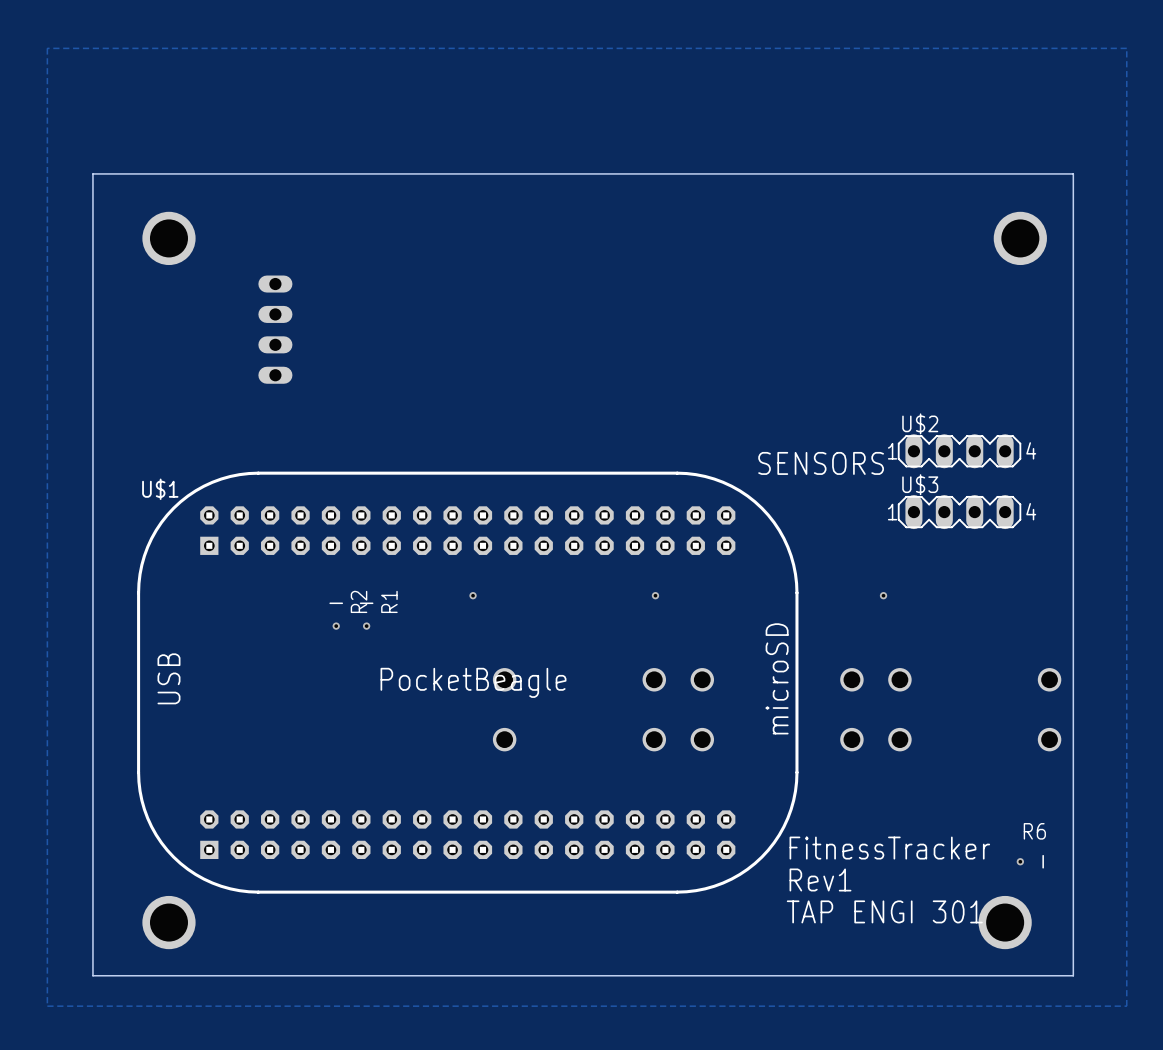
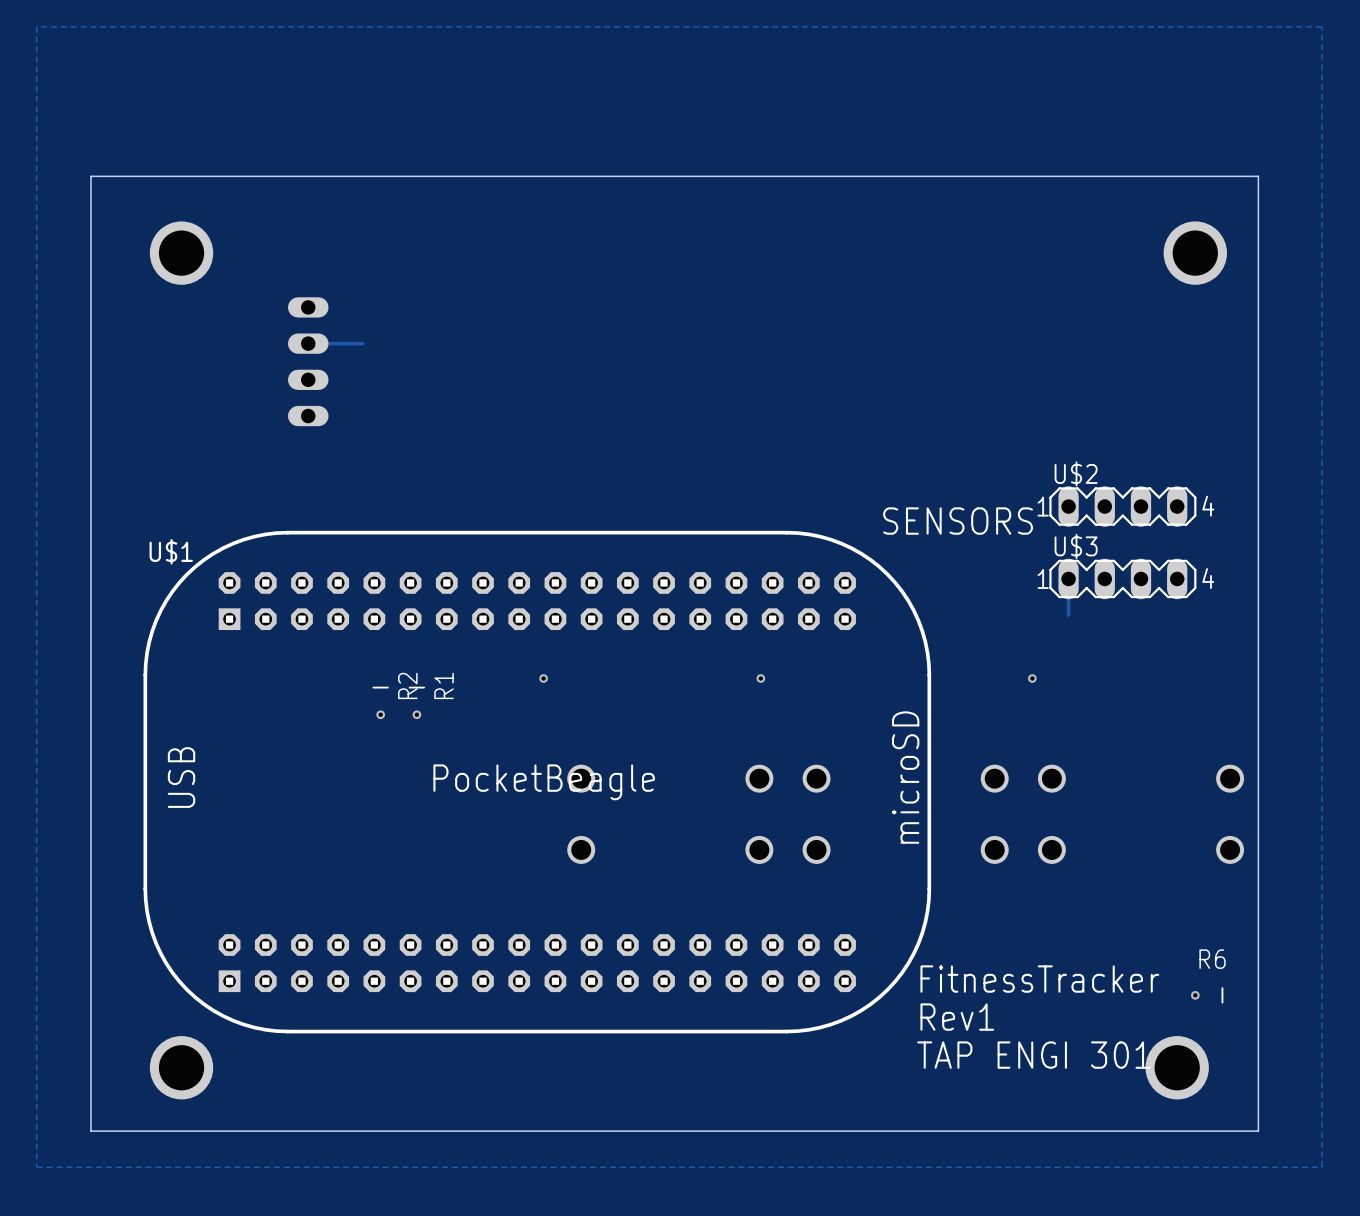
track: none -> (308, 343) (362, 343)
track: none -> (1068, 578) (1068, 615)

